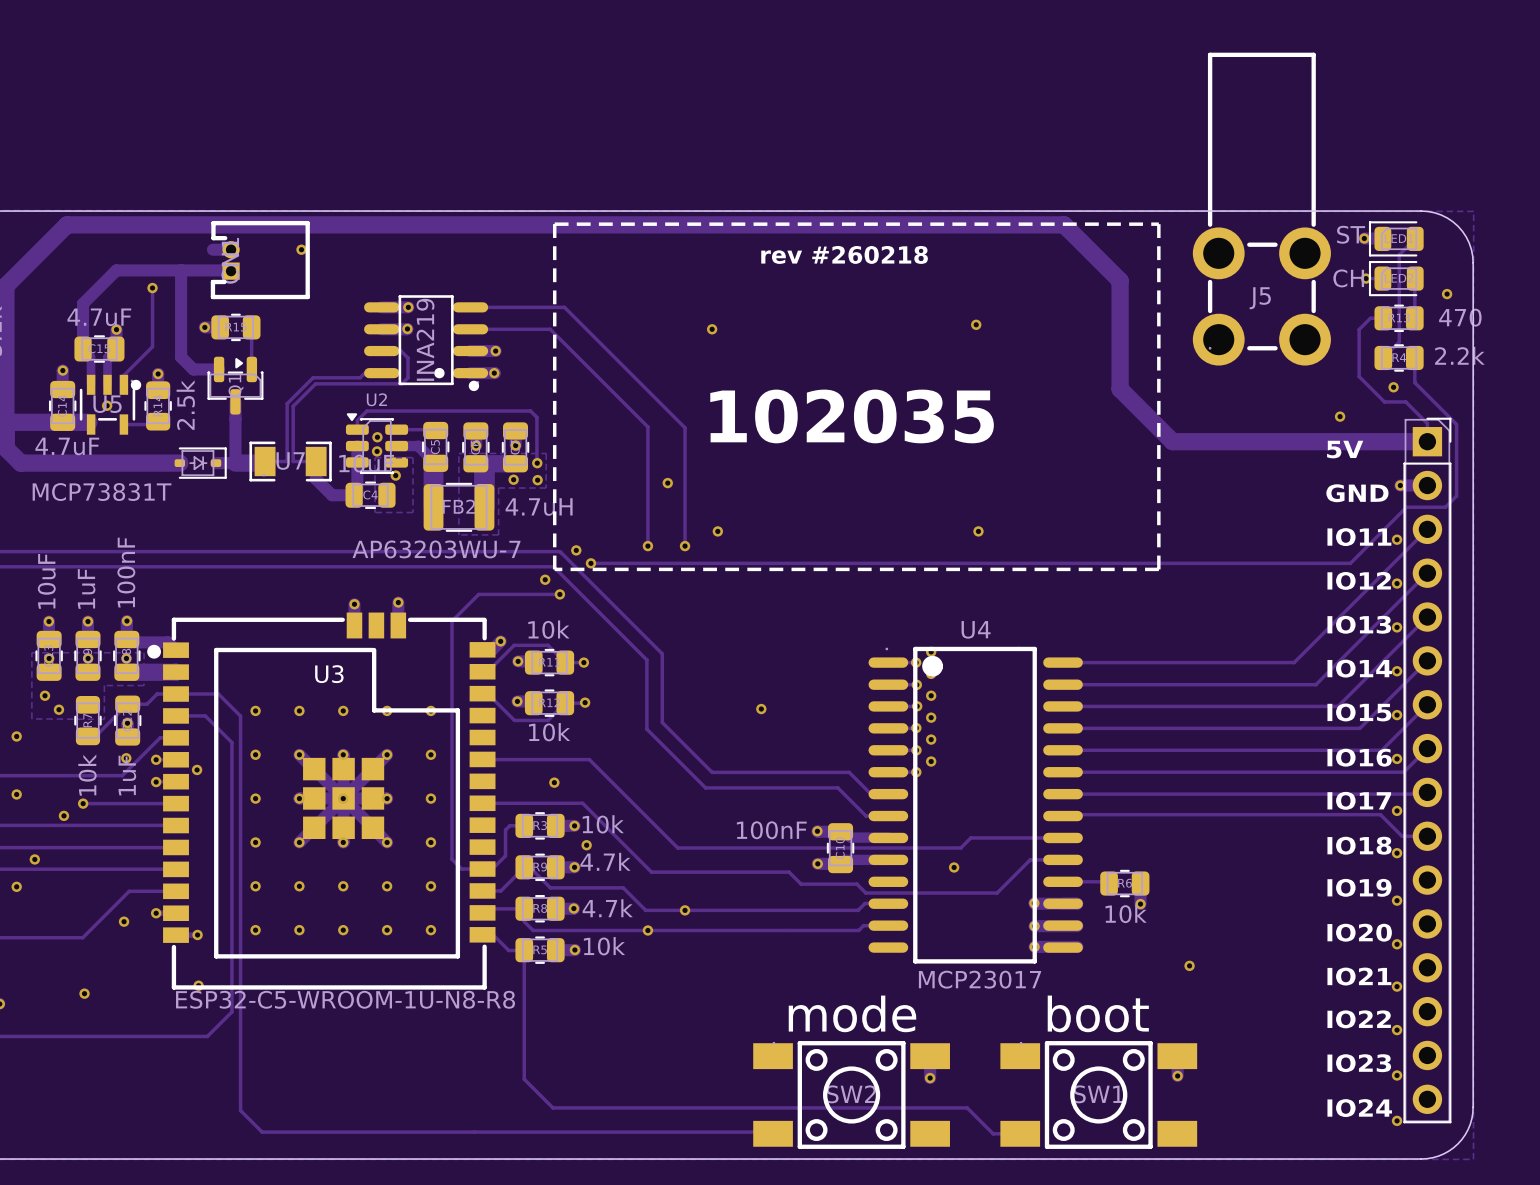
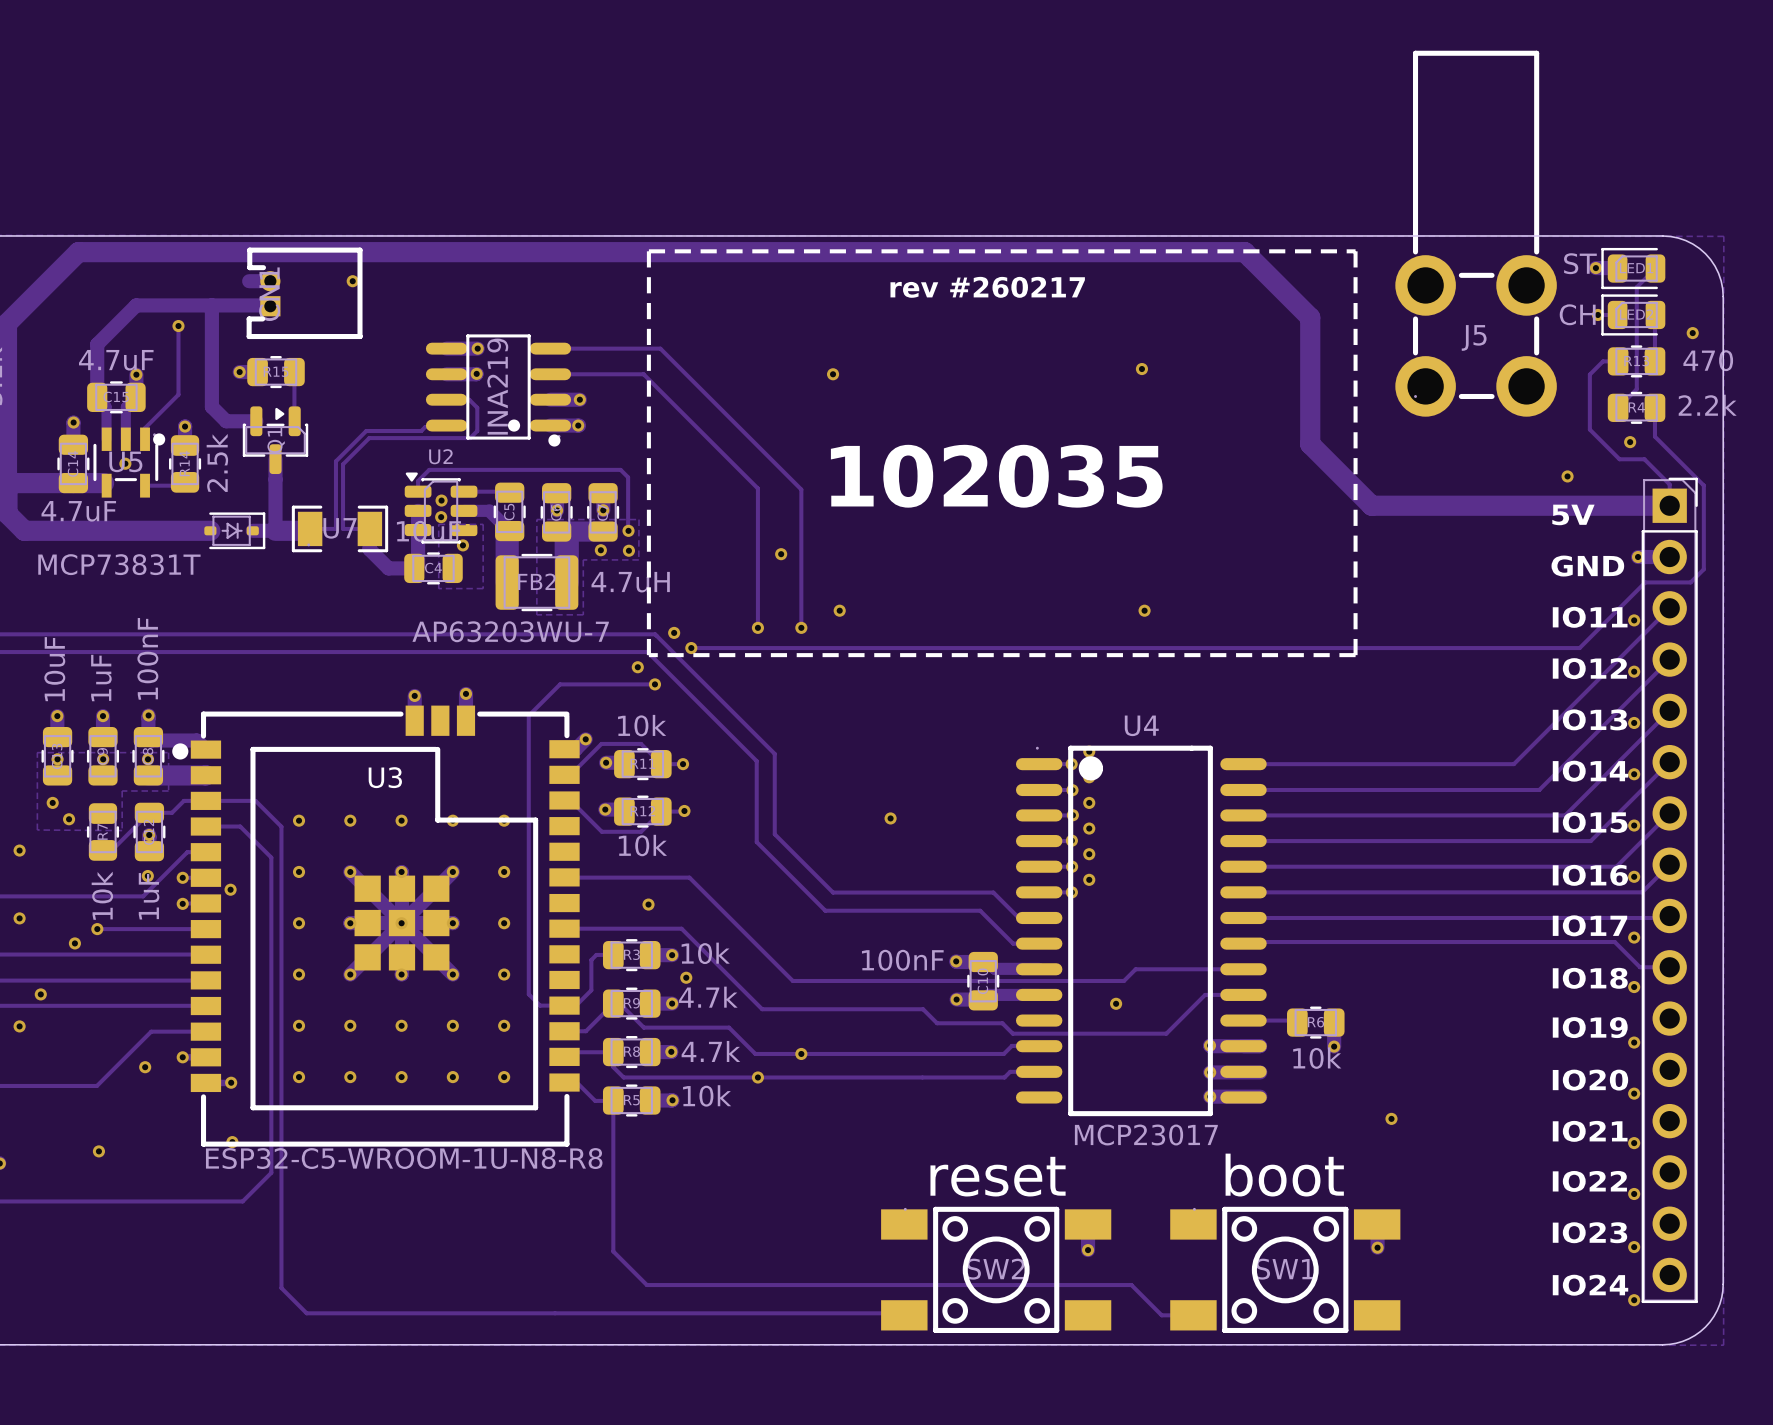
text: rev #260218 (844, 254) -> rev #260217 (987, 287)
SW2 value: mode (852, 1013) -> reset (998, 1176)

